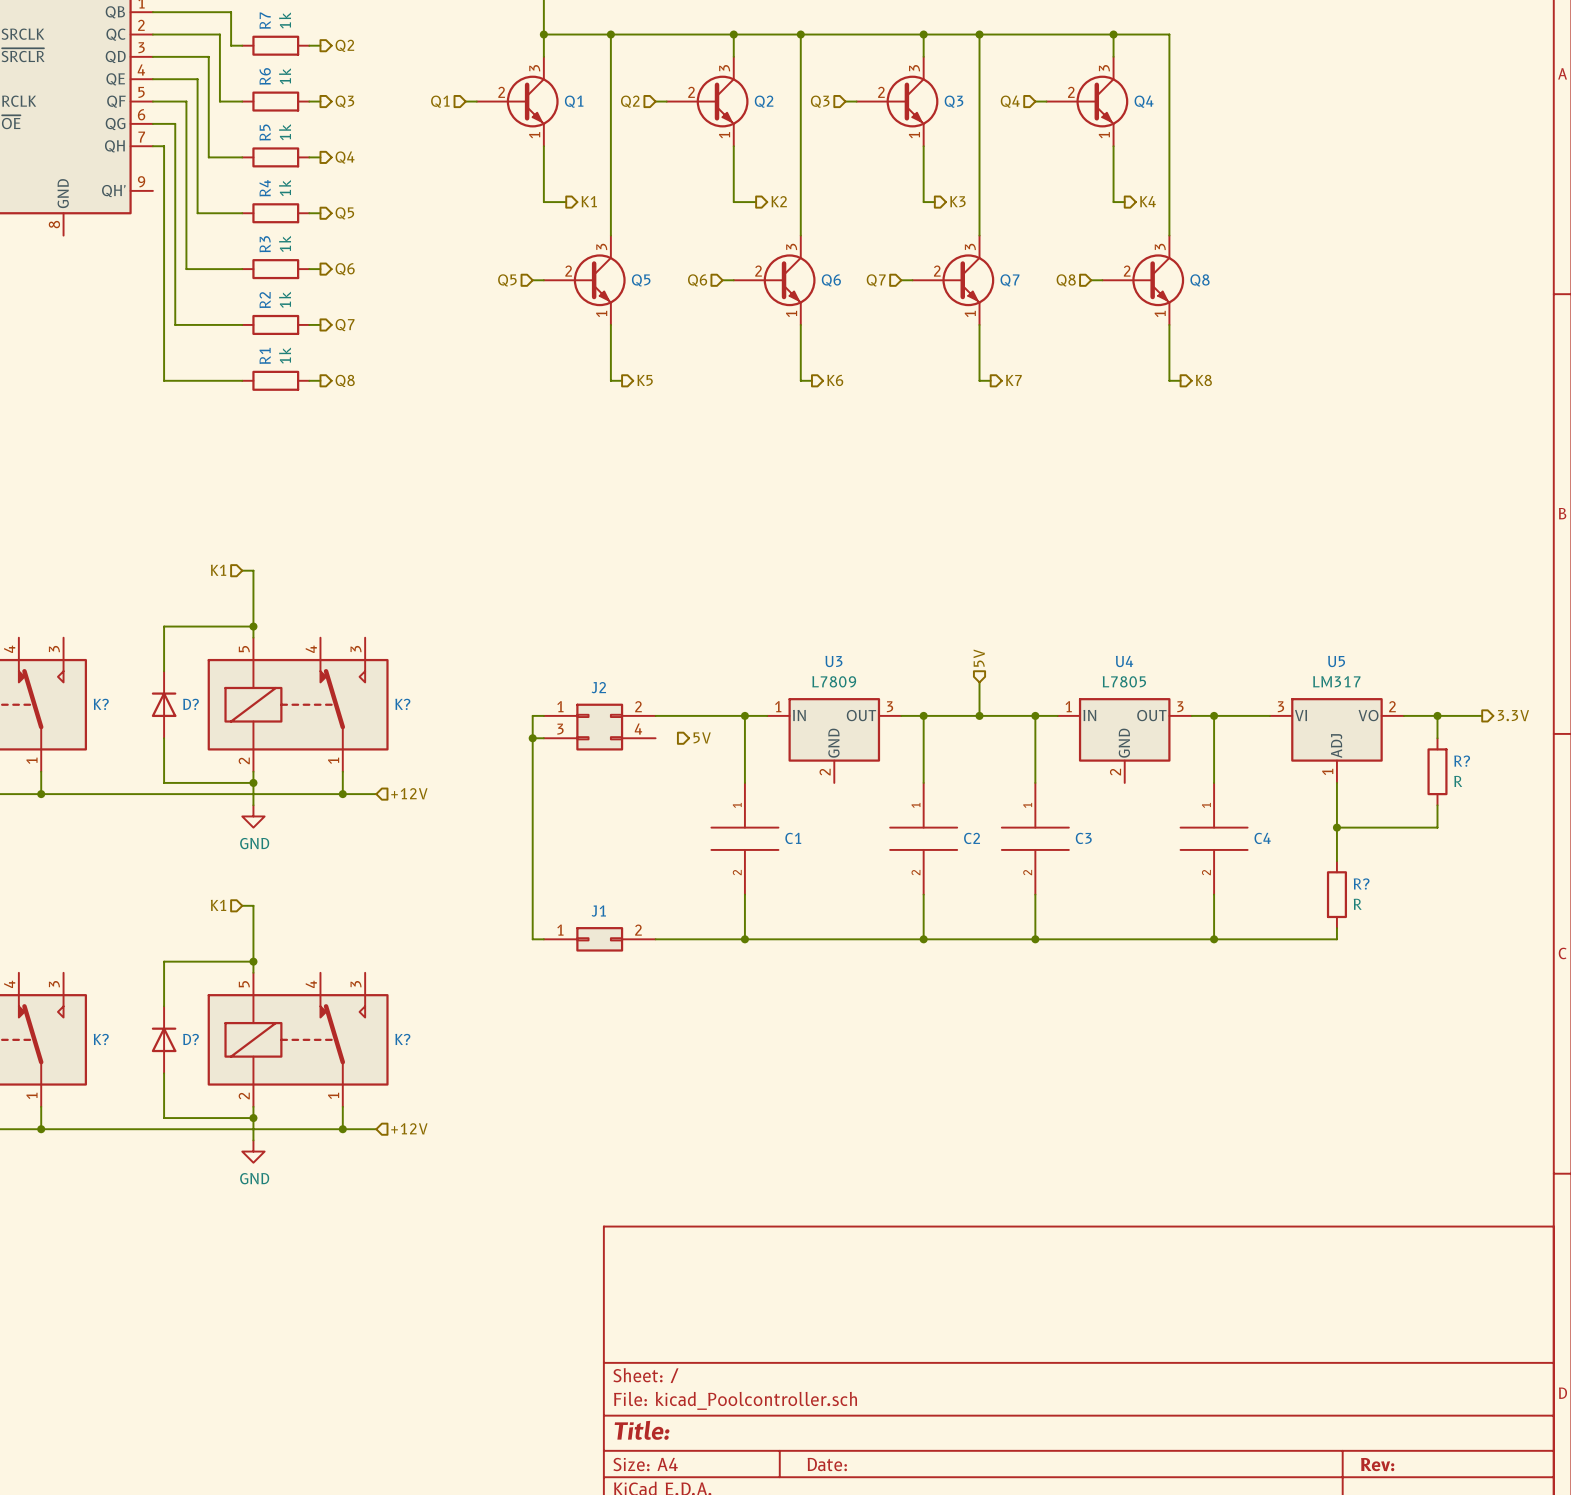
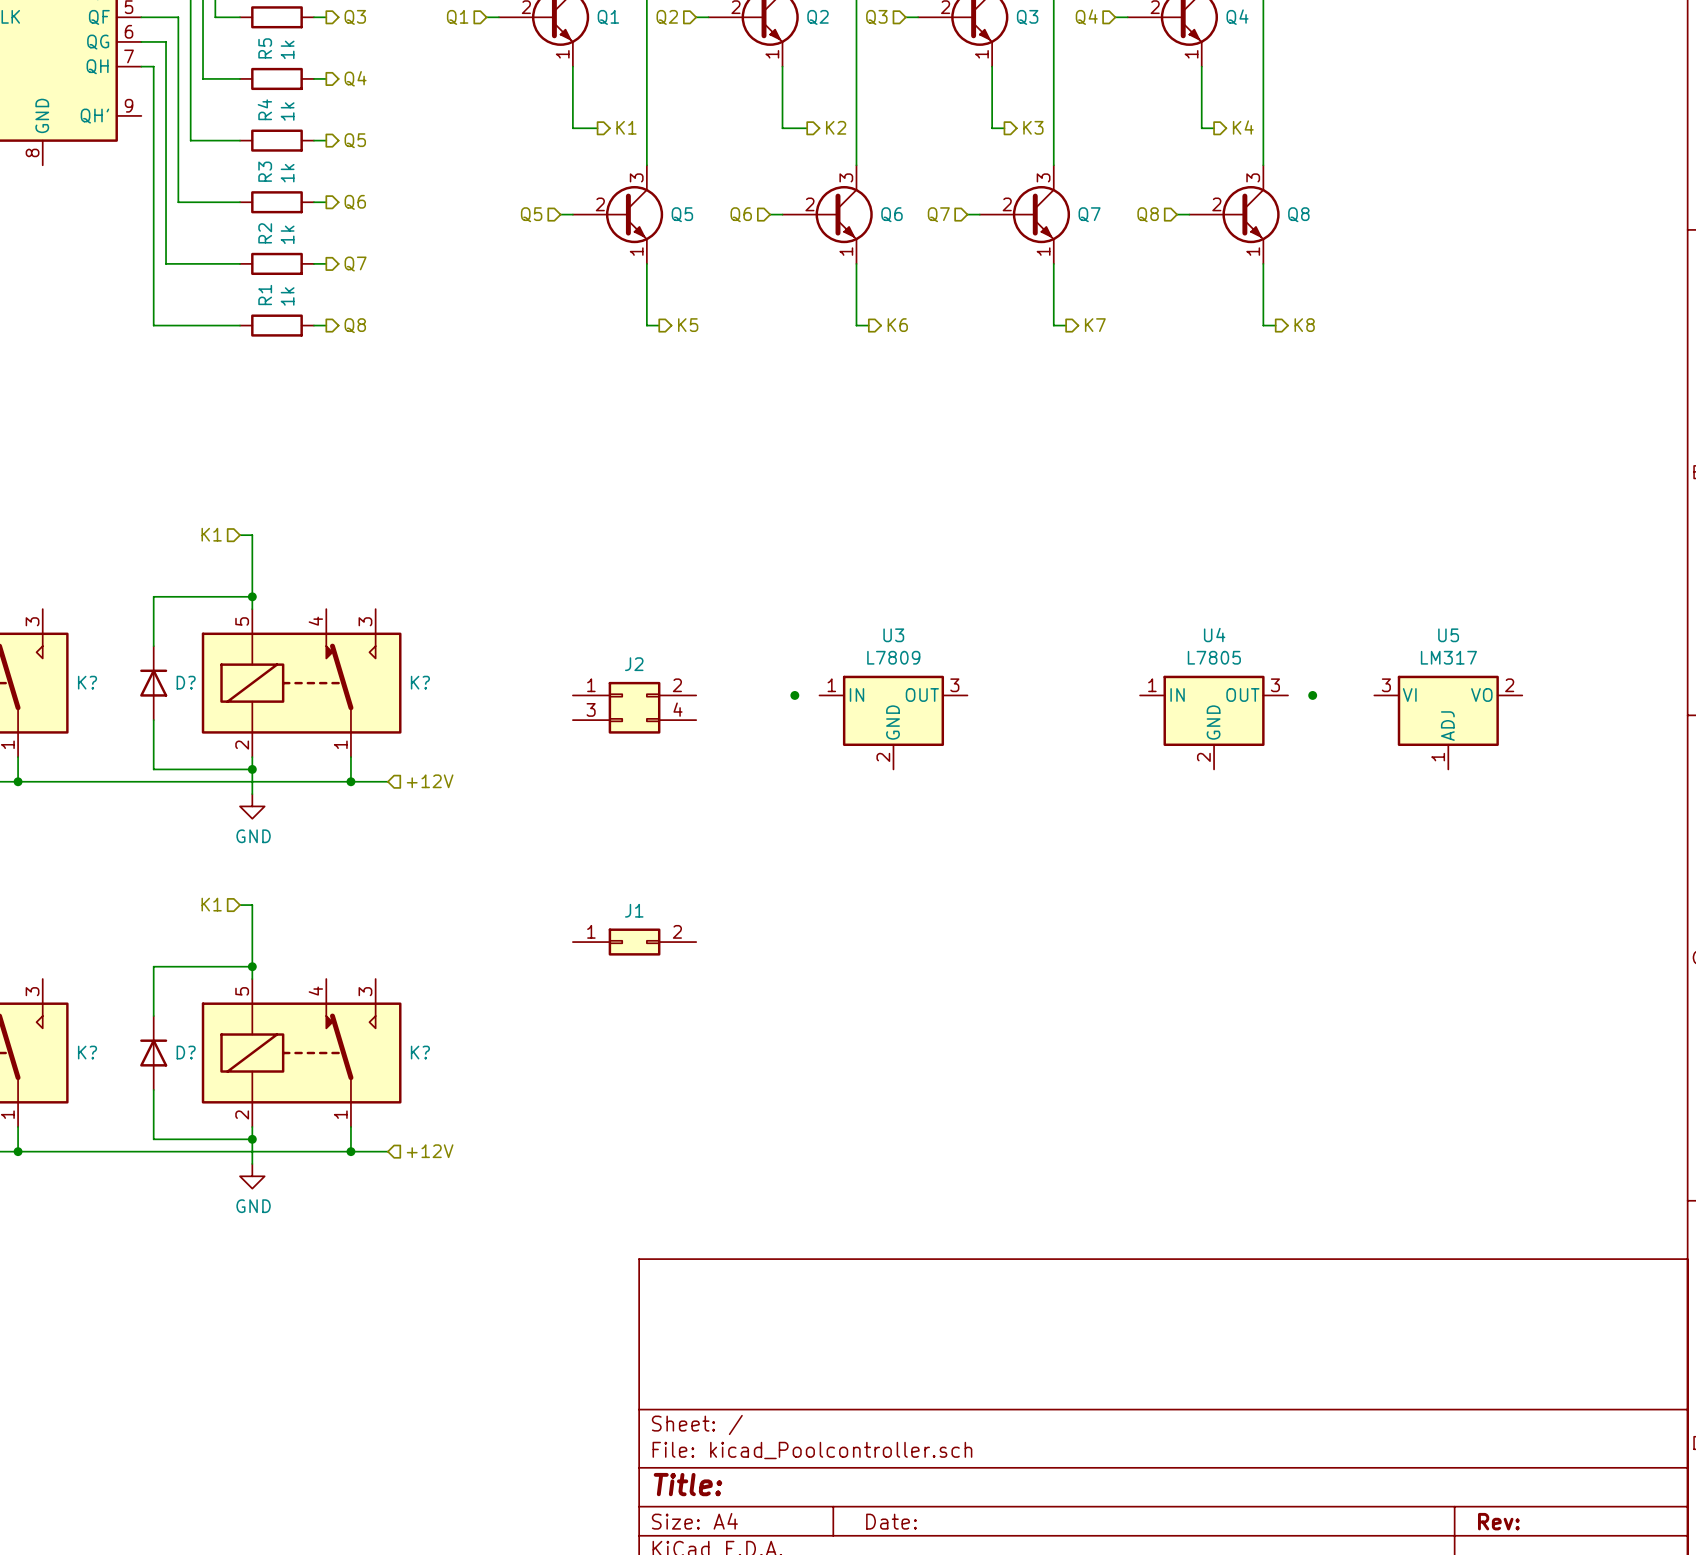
hierarchical label: 5V (979, 658) -> none
wire: (979, 682) (979, 715) -> none
wire: (543, 715) (532, 715) (532, 939) (543, 939) -> none
wire: (655, 715) (767, 715) -> none
wire: (744, 715) (744, 782) -> none
wire: (901, 715) (1057, 715) -> none
wire: (923, 715) (923, 782) -> none
junction: (923, 715) -> none
junction: (979, 715) -> none
wire: (1035, 715) (1035, 782) -> none
junction: (1035, 715) -> none
wire: (1191, 715) (1269, 715) -> none
wire: (1214, 715) (1214, 782) -> none
wire: (1403, 715) (1482, 715) -> none
wire: (1437, 715) (1437, 738) -> none
junction: (1437, 715) -> none
hierarchical label: 3.3V (1513, 715) -> none
hierarchical label: 5V (702, 737) -> none
wire: (532, 738) (543, 738) -> none
junction: (532, 738) -> none
R?: R (1437, 771) -> none
wire: (1336, 782) (1336, 861) -> none
wire: (1437, 805) (1437, 827) (1336, 827) -> none
junction: (1336, 827) -> none
C1: (744, 838) -> none
C2: (923, 838) -> none
C3: (1035, 838) -> none
C4: (1214, 838) -> none
wire: (744, 894) (744, 939) -> none
wire: (923, 894) (923, 939) -> none
wire: (1035, 894) (1035, 939) -> none
wire: (1214, 894) (1214, 939) -> none
R?: R (1336, 894) -> none
wire: (1336, 928) (1336, 939) (655, 939) -> none
junction: (744, 939) -> none
junction: (923, 939) -> none
junction: (1035, 939) -> none
junction: (1214, 939) -> none

